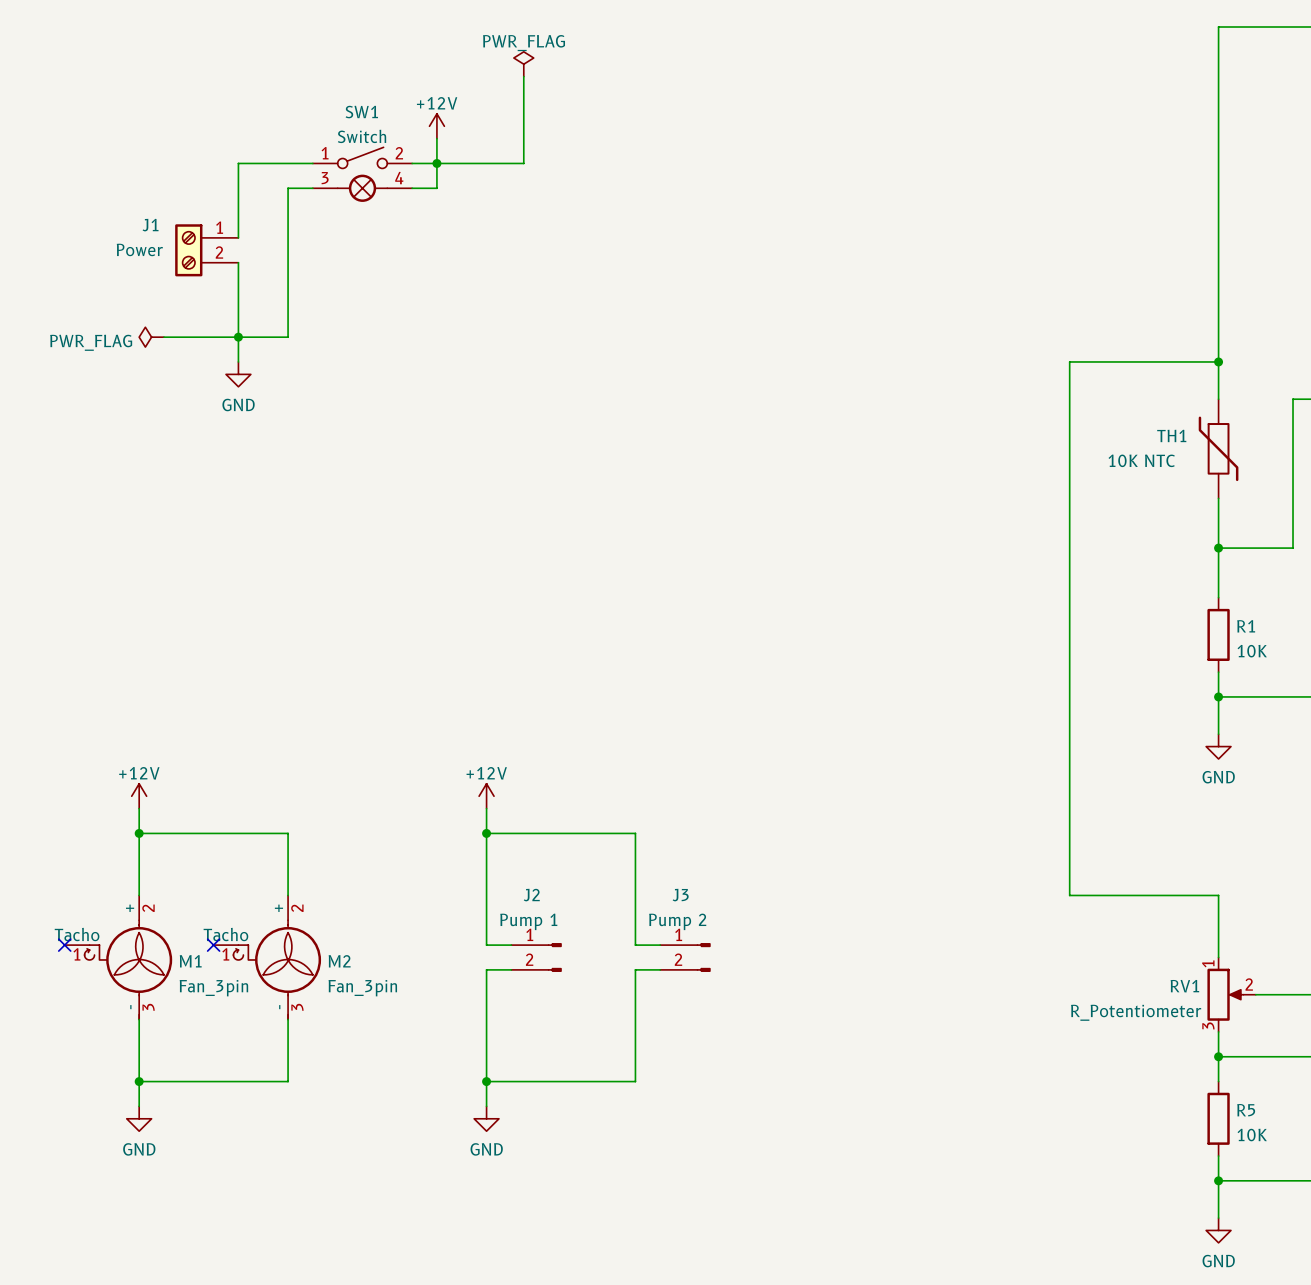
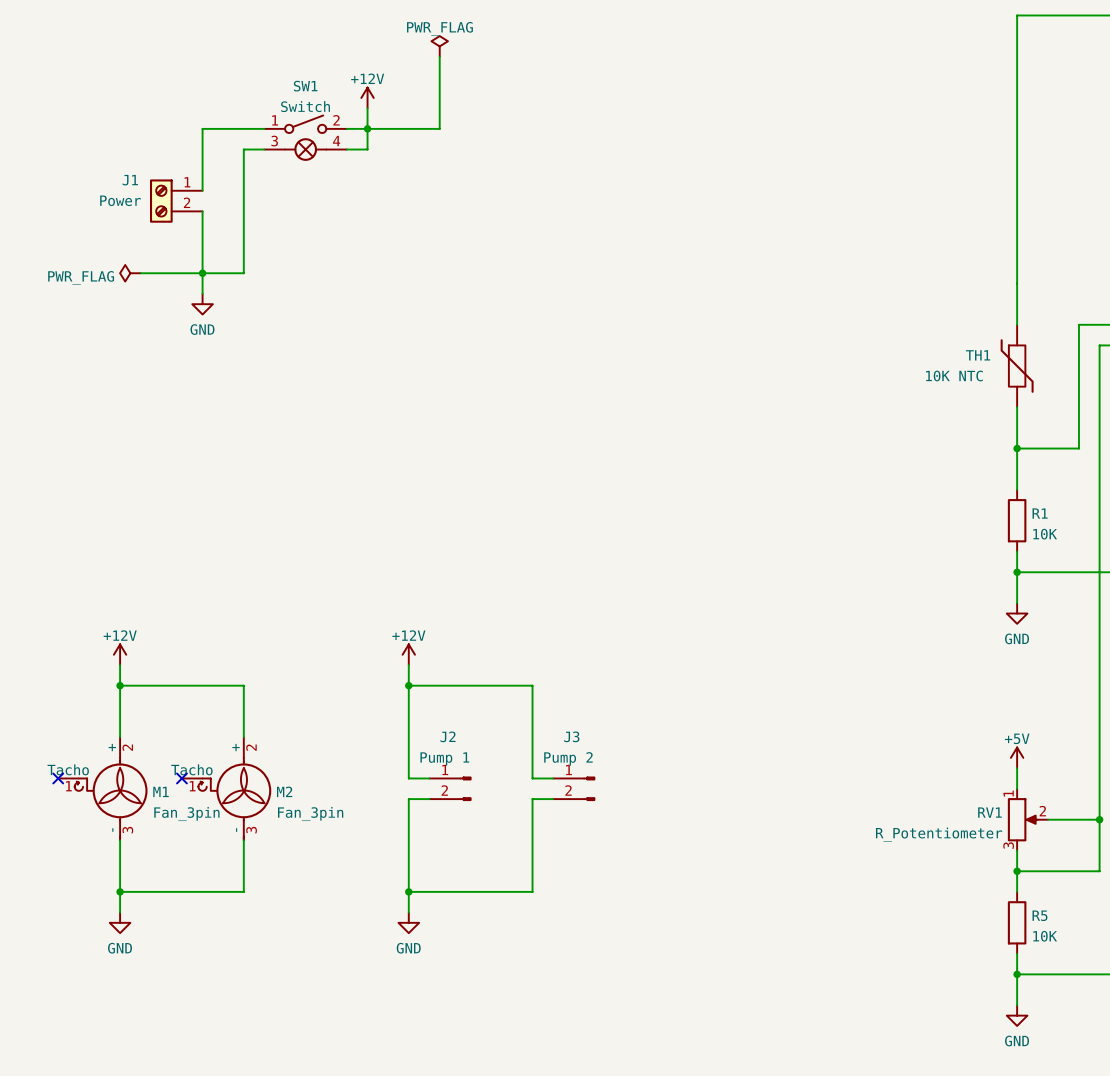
wire: (1218, 361) (1069, 361) (1069, 895) (1218, 895) (1218, 932) -> none
junction: (1218, 361) -> none
power symbol: none -> +5V (1017, 757)

